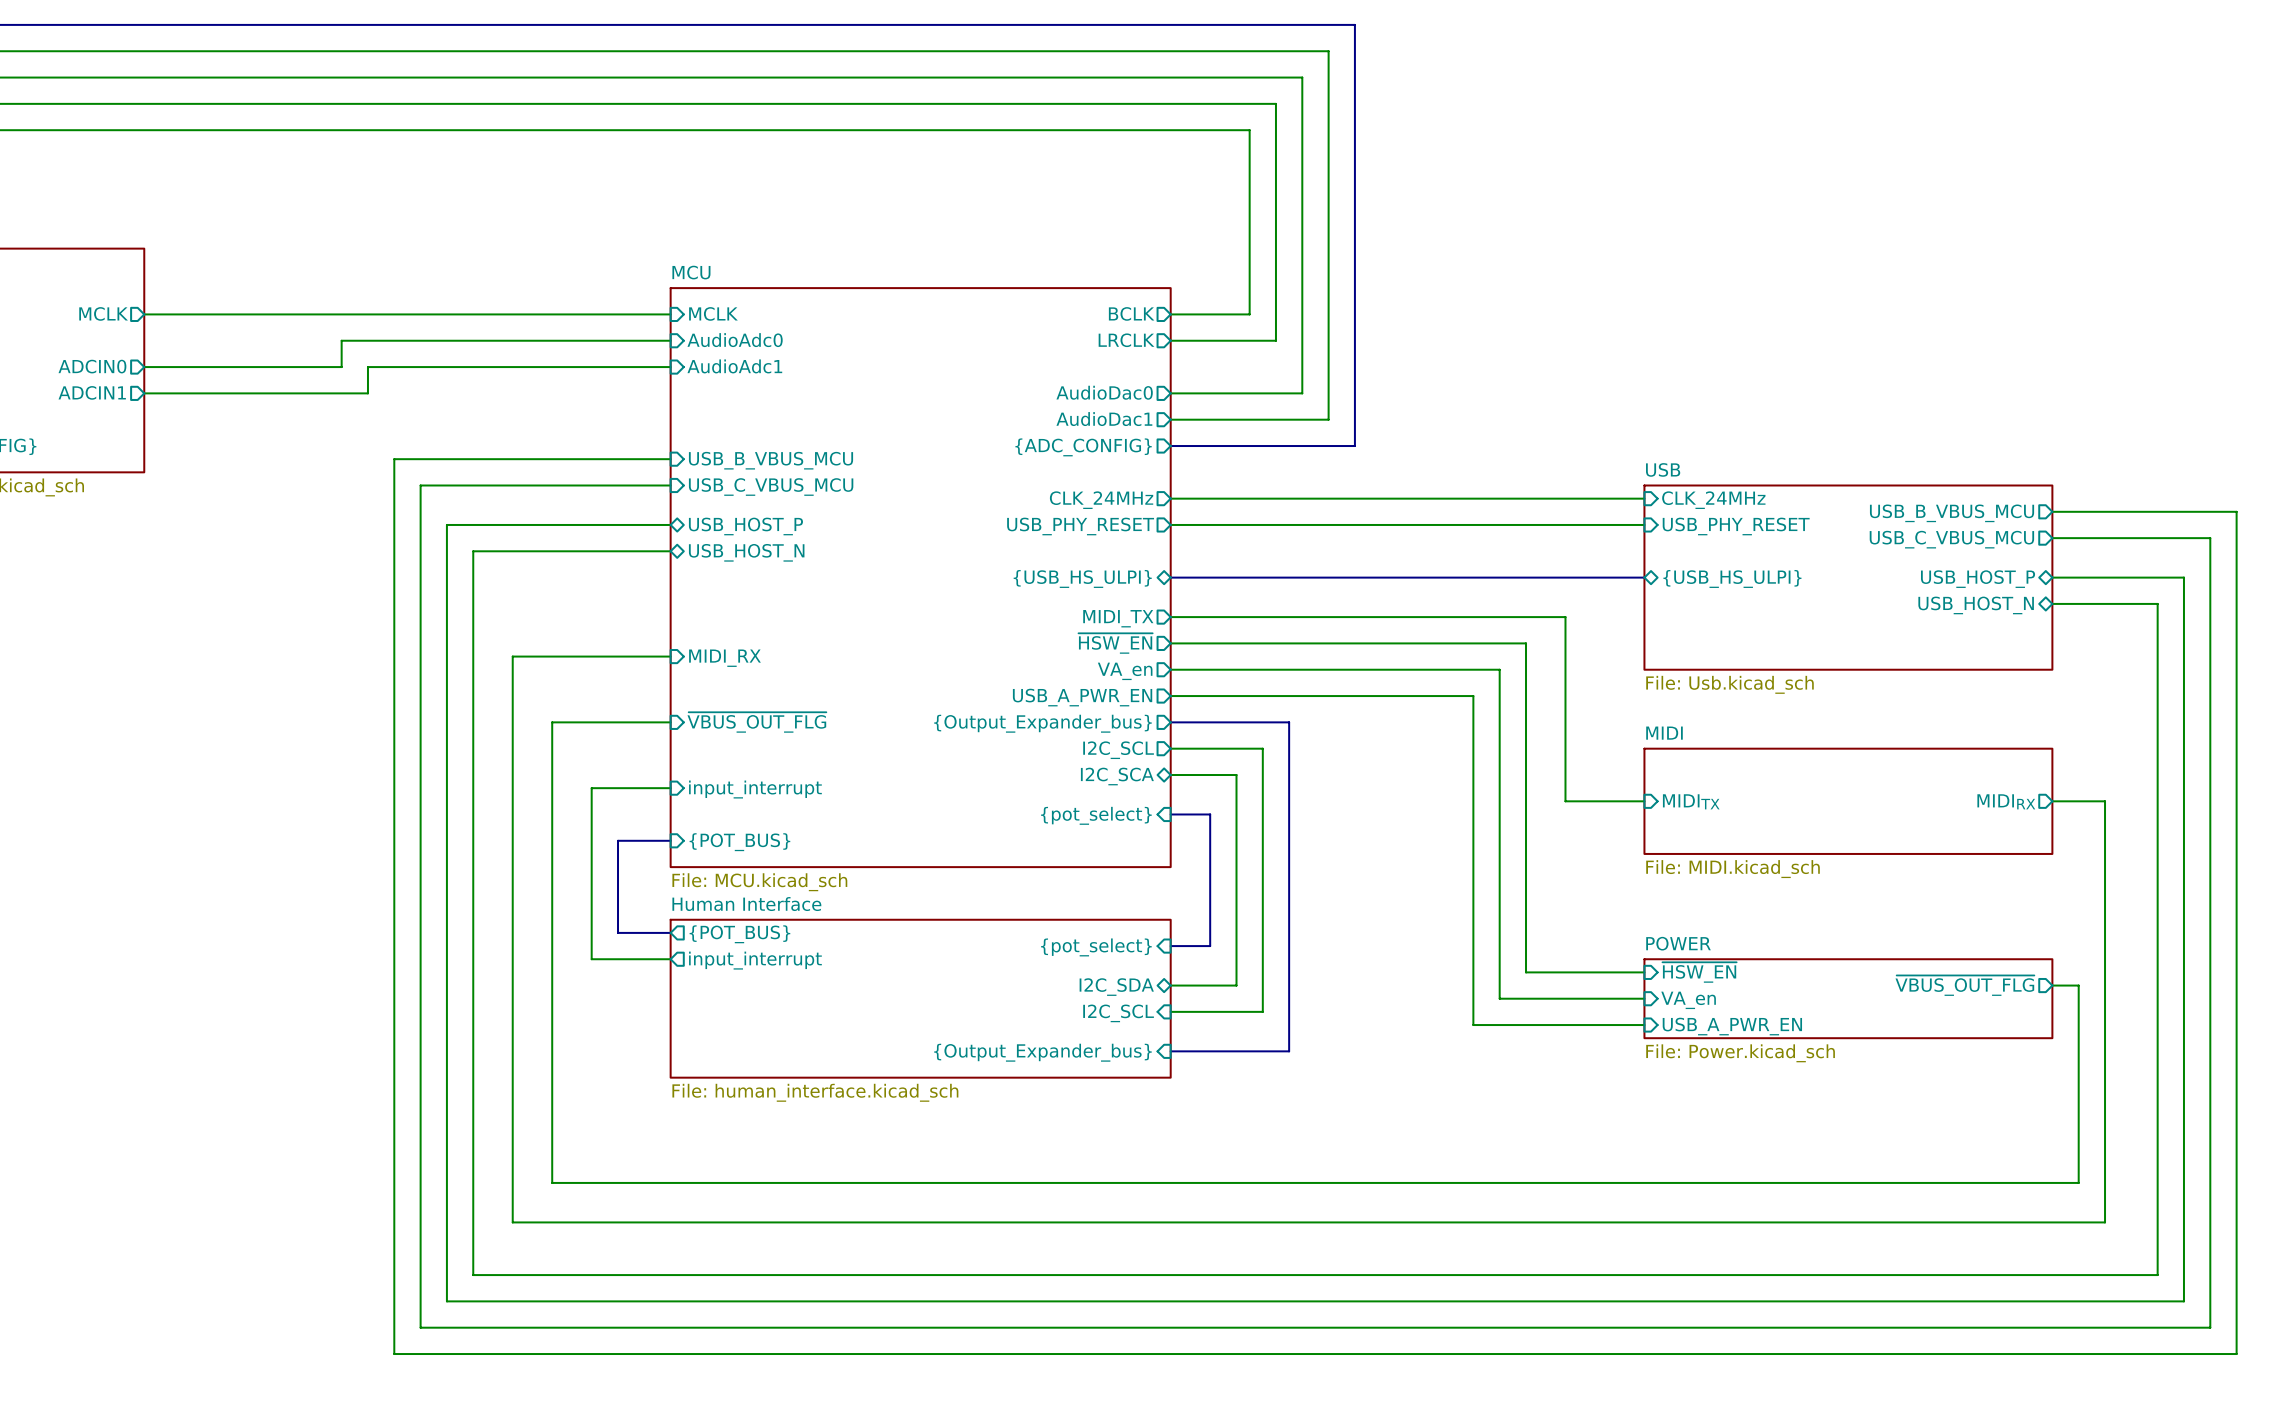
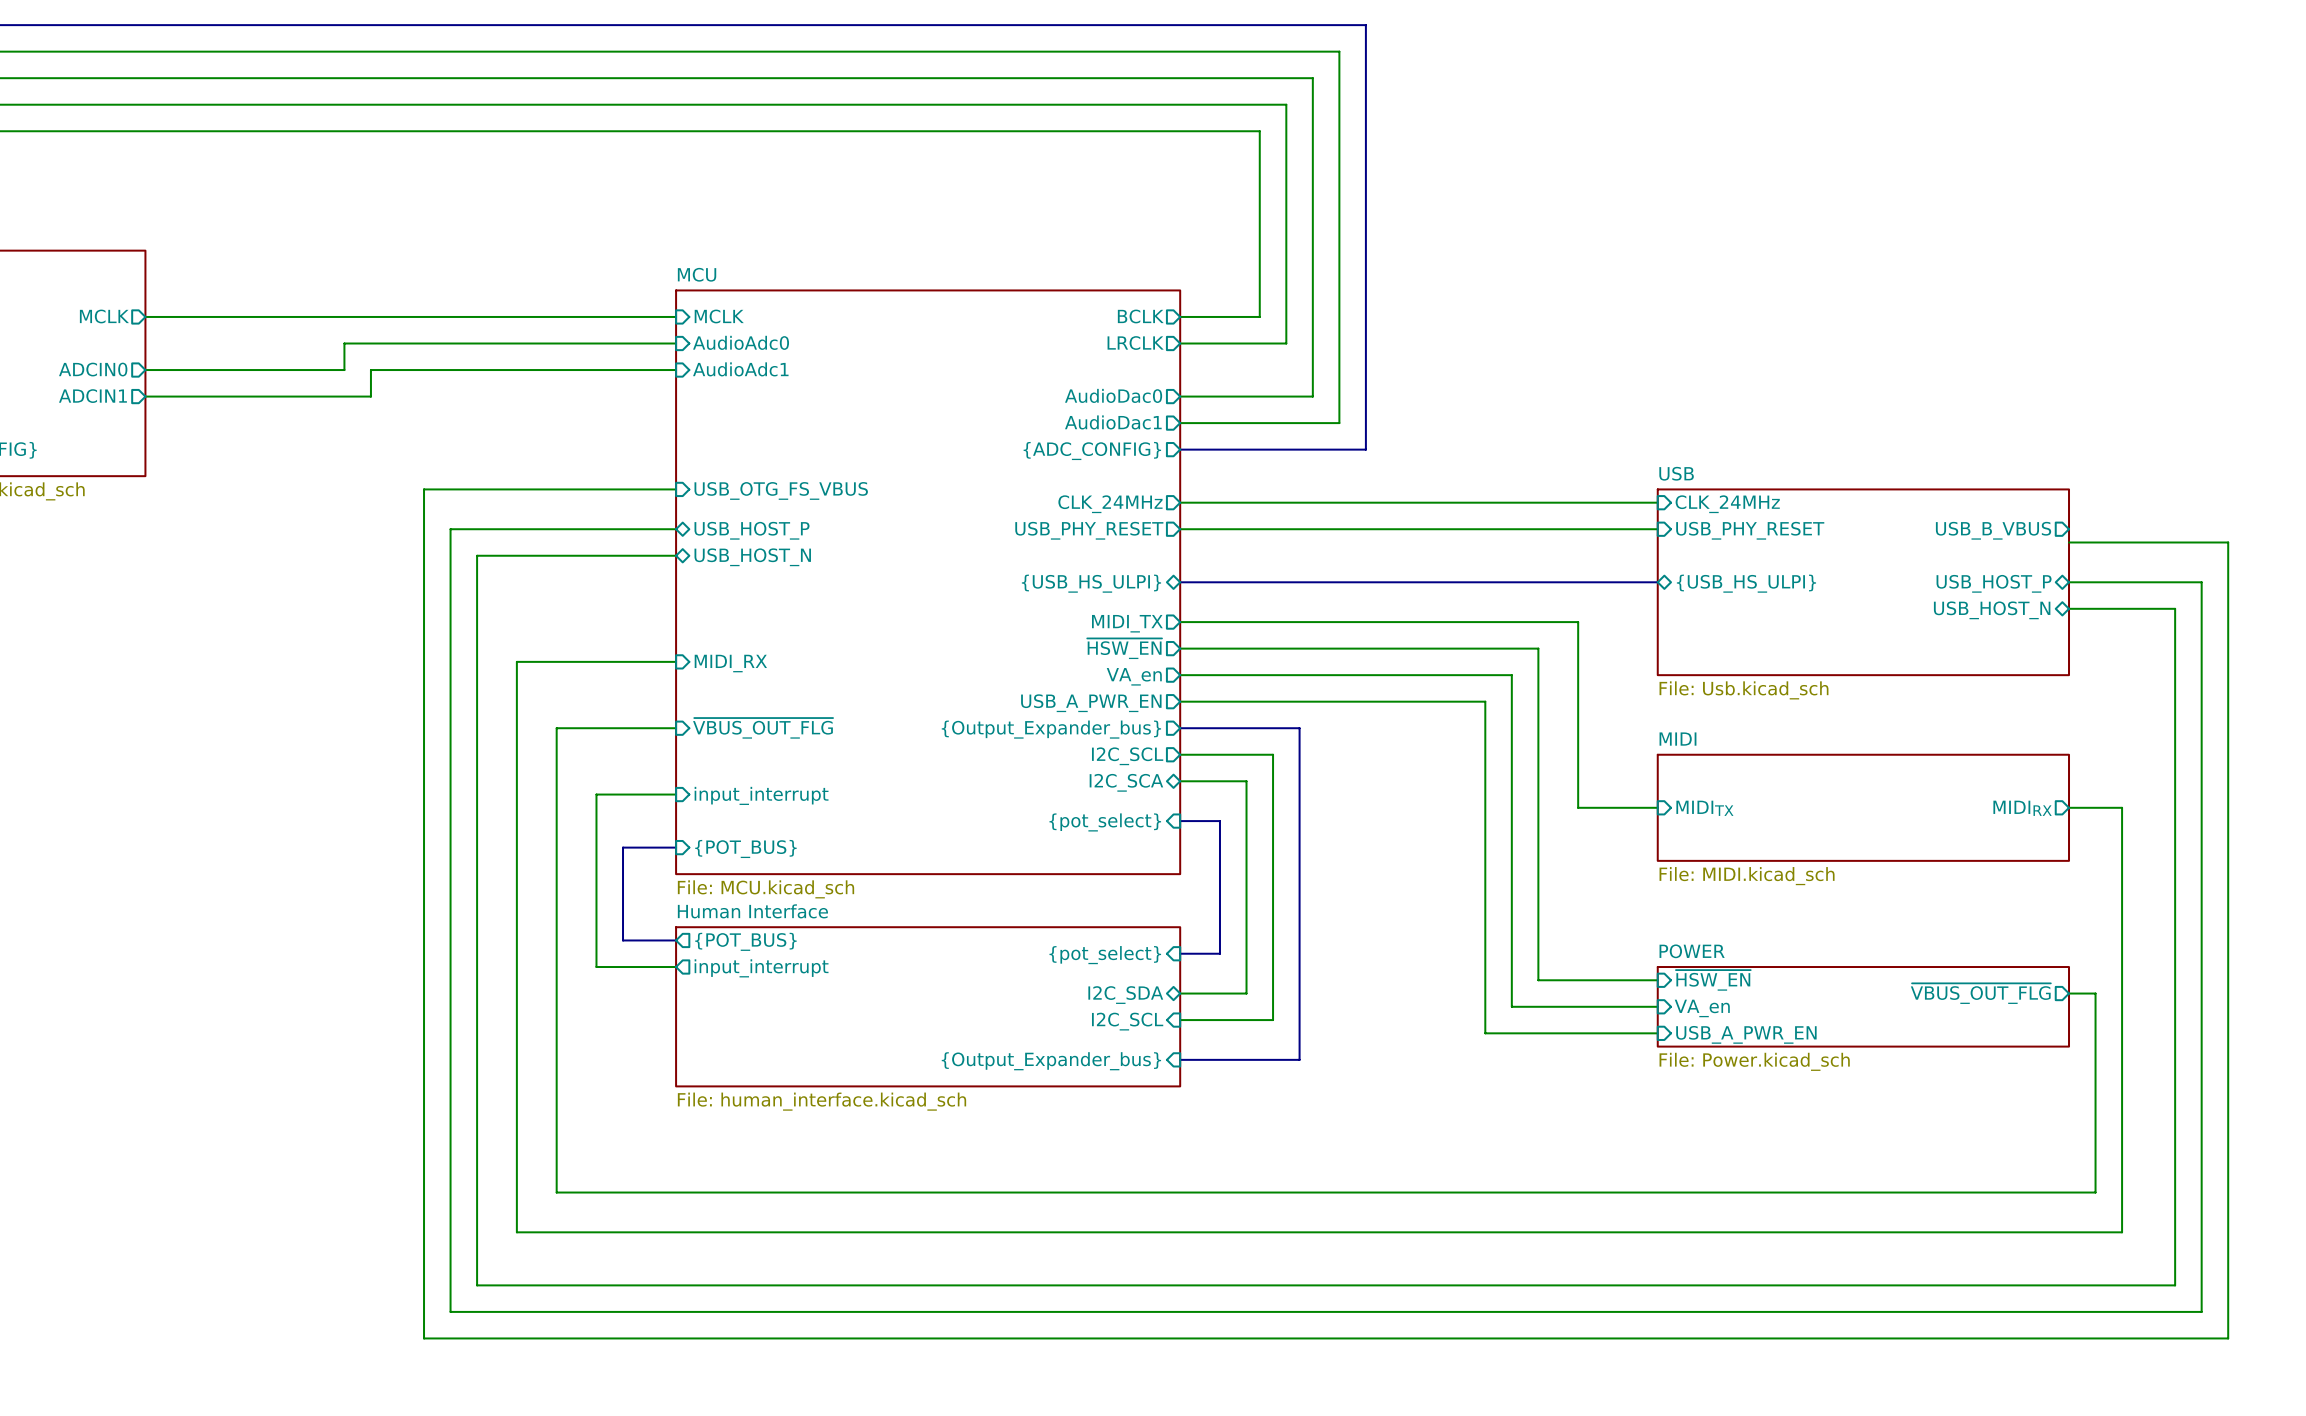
wire: (670, 459) (394, 459) (394, 1354) (2236, 1354) (2236, 511) (2052, 511) -> none
sheet pin: USB_B_VBUS_MCU (771, 460) -> none
sheet pin: USB_C_VBUS_MCU (771, 487) -> USB_OTG_FS_VBUS (781, 490)
sheet pin: USB_B_VBUS_MCU (1952, 513) -> none
sheet pin: none -> USB_B_VBUS (1993, 530)
sheet pin: USB_C_VBUS_MCU (1951, 539) -> none

